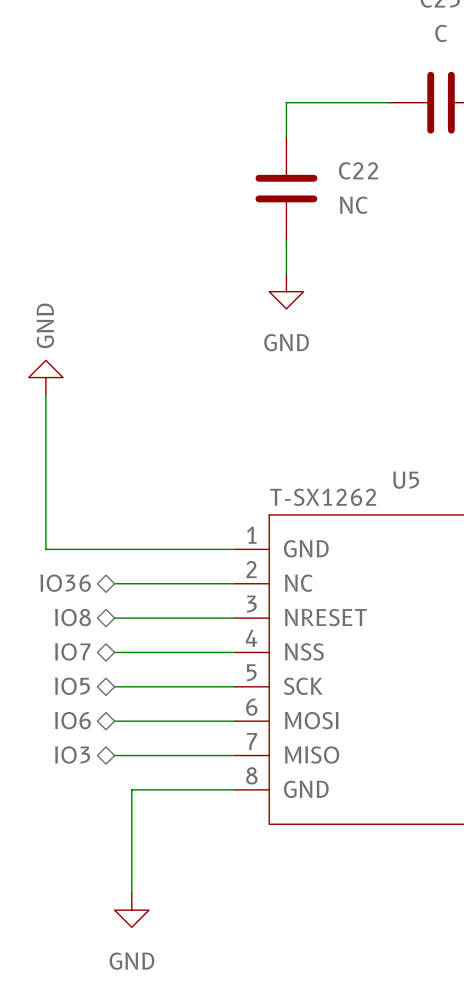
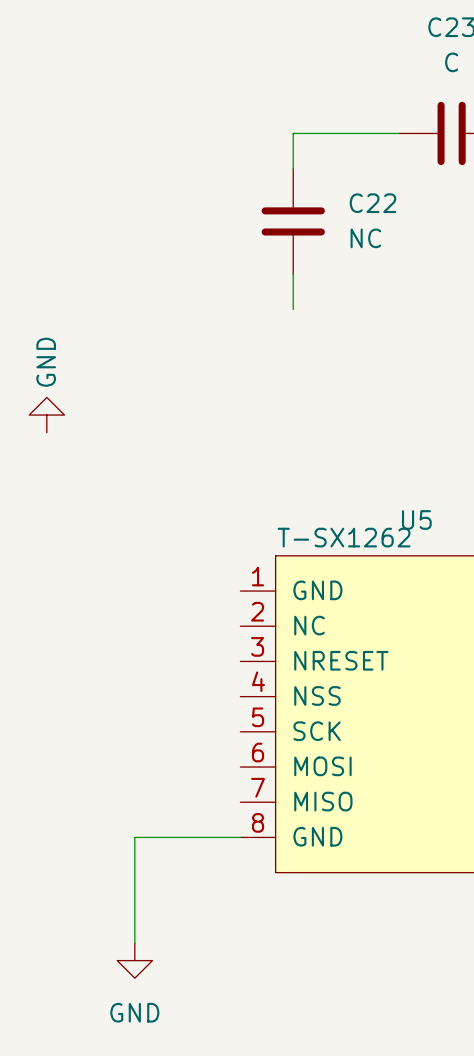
power symbol: GND (286, 291) -> none
wire: (45, 394) (45, 549) (234, 549) -> none
hierarchical label: IO36 (65, 583) -> none
wire: (114, 583) (234, 583) -> none
hierarchical label: IO8 (72, 617) -> none
wire: (114, 618) (234, 618) -> none
hierarchical label: IO7 (72, 651) -> none
wire: (114, 652) (234, 652) -> none
hierarchical label: IO5 (72, 686) -> none
wire: (114, 686) (234, 686) -> none
hierarchical label: IO6 (72, 720) -> none
wire: (114, 721) (234, 721) -> none
hierarchical label: IO3 (72, 754) -> none
wire: (114, 755) (234, 755) -> none

